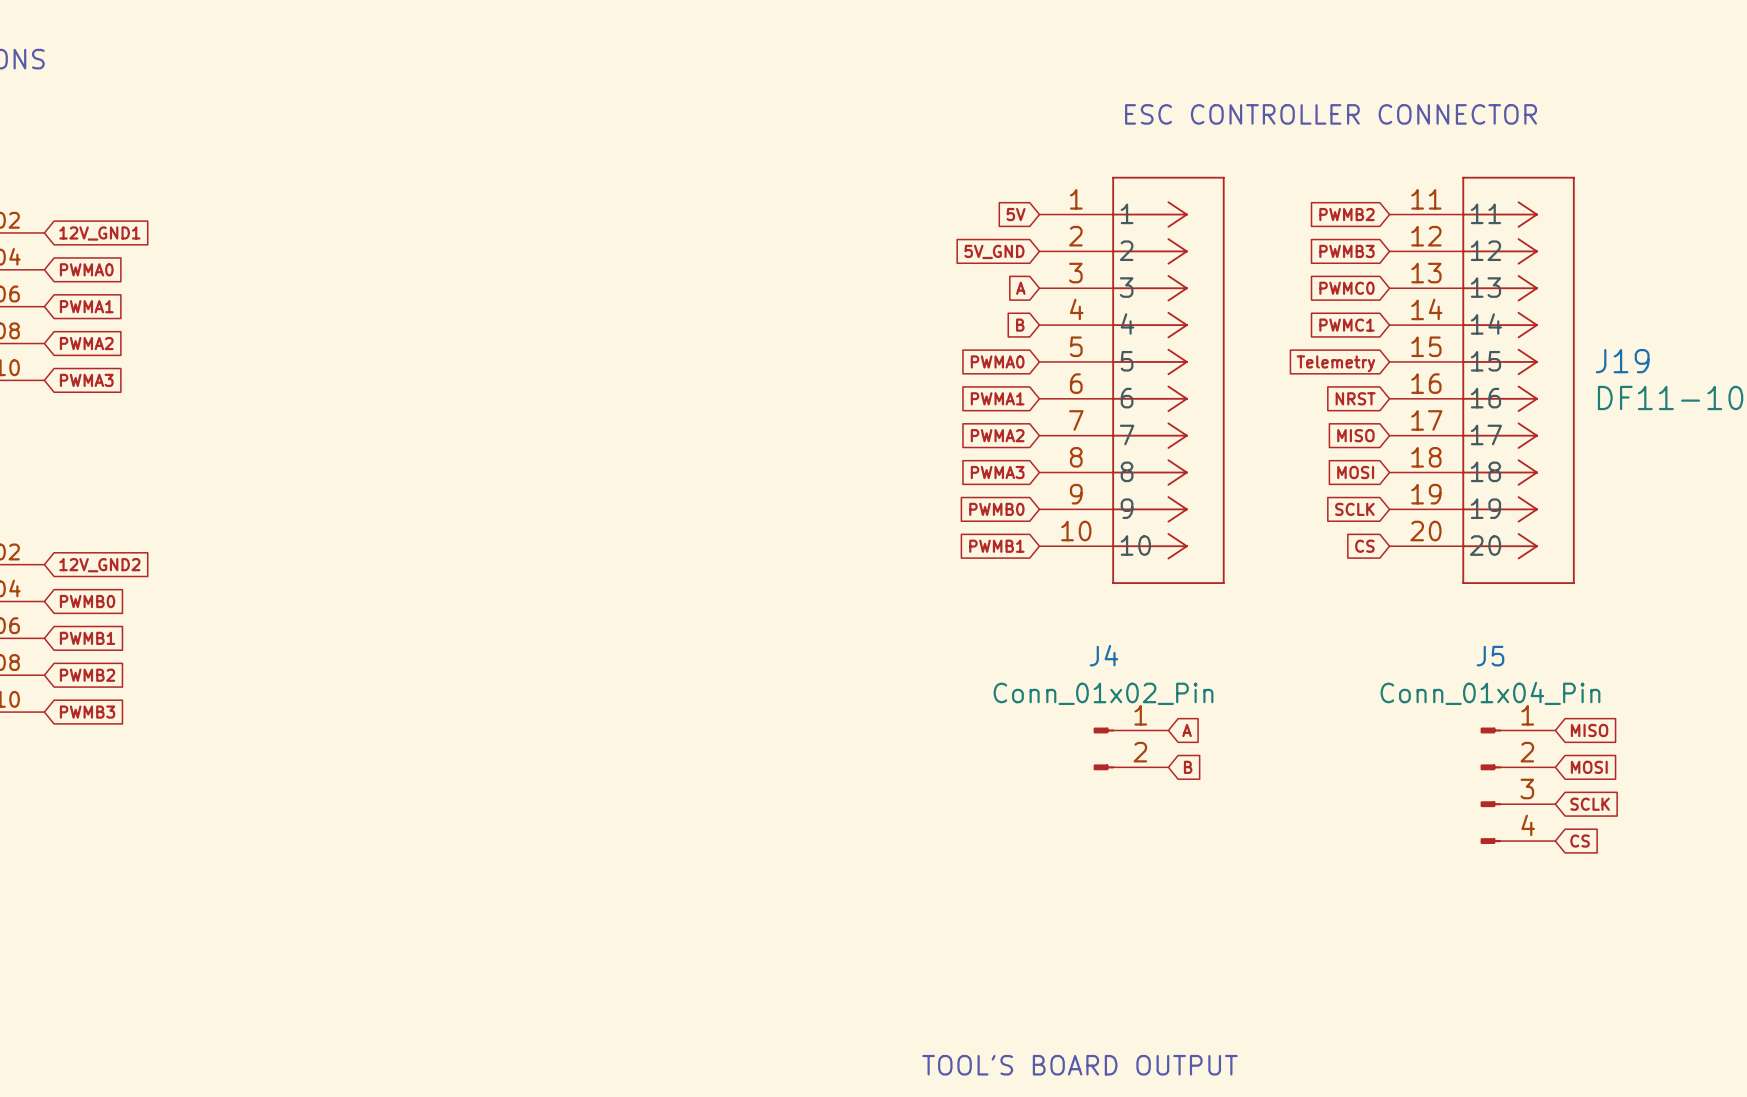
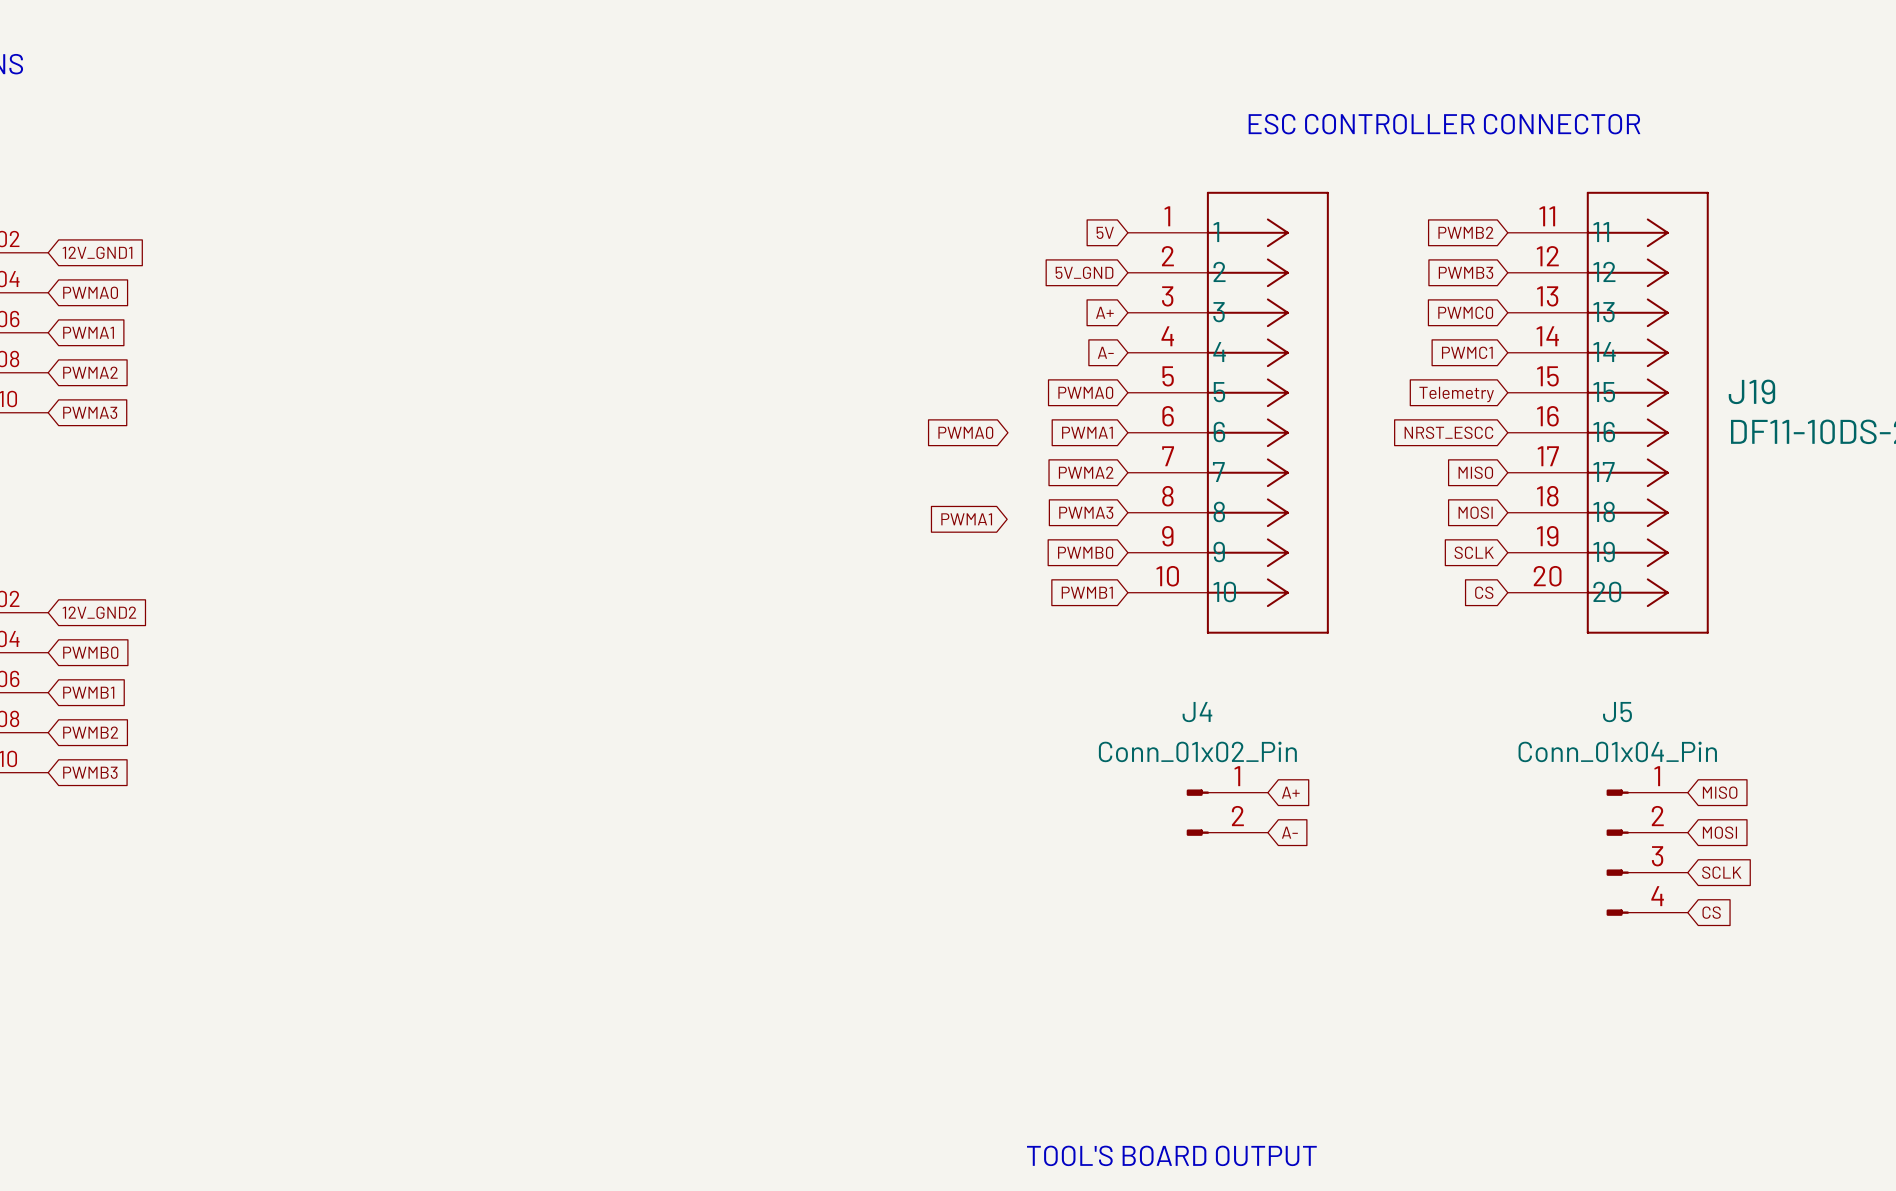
global label: A (1020, 288) -> A+ (1104, 312)
global label: B (1020, 325) -> A- (1105, 352)
global label: none -> PWMA0 (965, 432)
global label: NRST (1355, 398) -> NRST_ESCC (1448, 432)
global label: none -> PWMA1 (966, 519)
global label: A (1187, 730) -> A+ (1290, 792)
global label: B (1188, 767) -> A- (1289, 832)

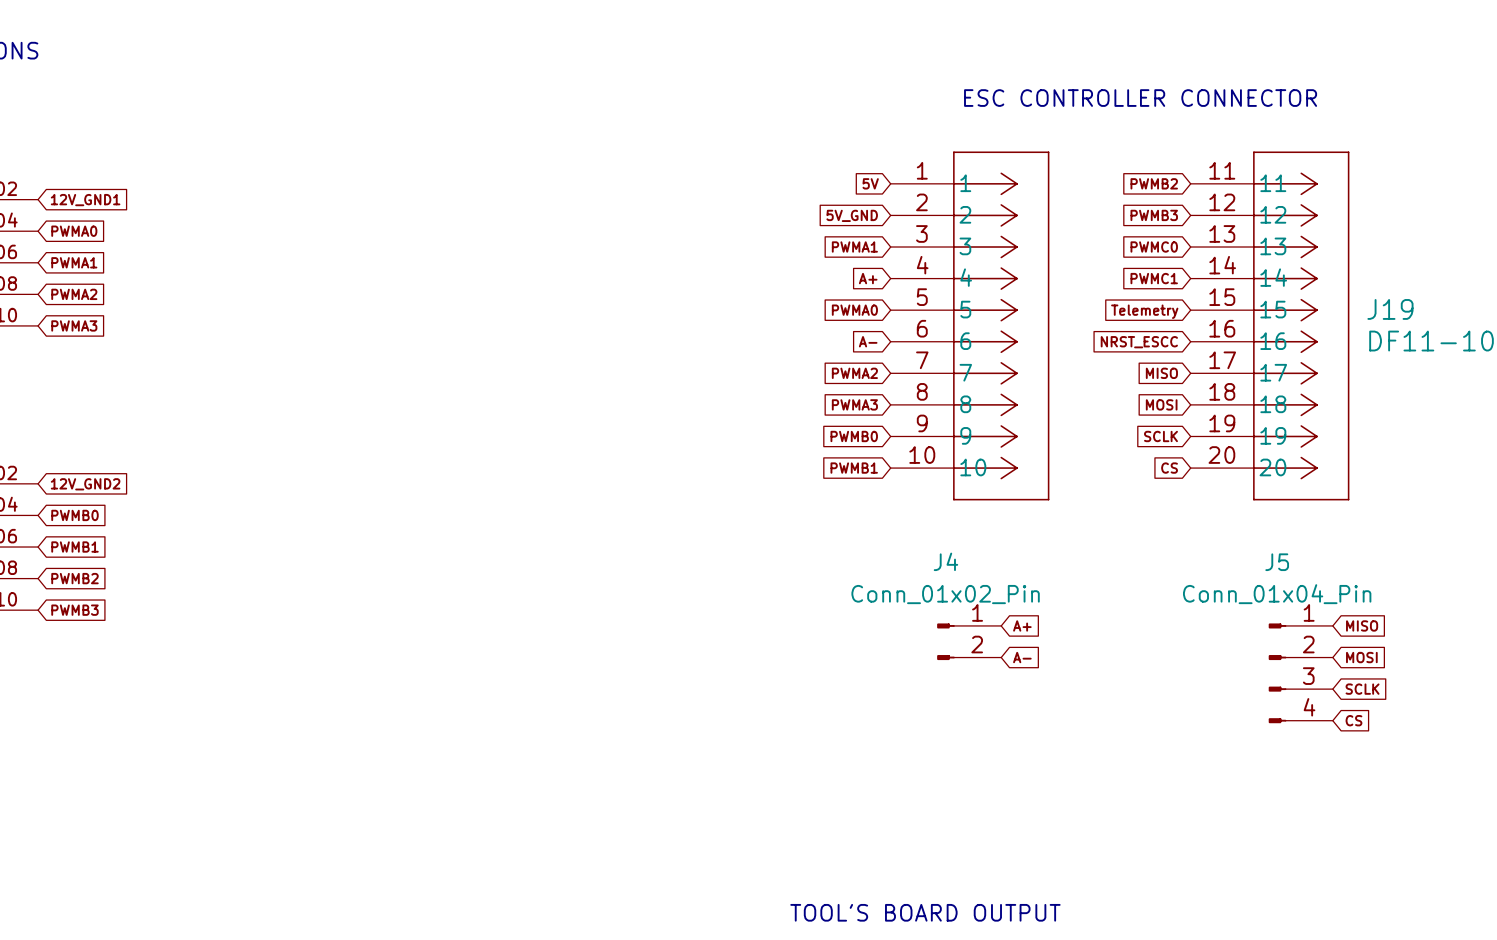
global label: A+ (1104, 312) -> PWMA1 (854, 247)
global label: A- (1105, 352) -> A+ (868, 278)
global label: PWMA0 (965, 432) -> none
global label: PWMA1 (1087, 432) -> A- (868, 341)
global label: PWMA1 (966, 519) -> none

